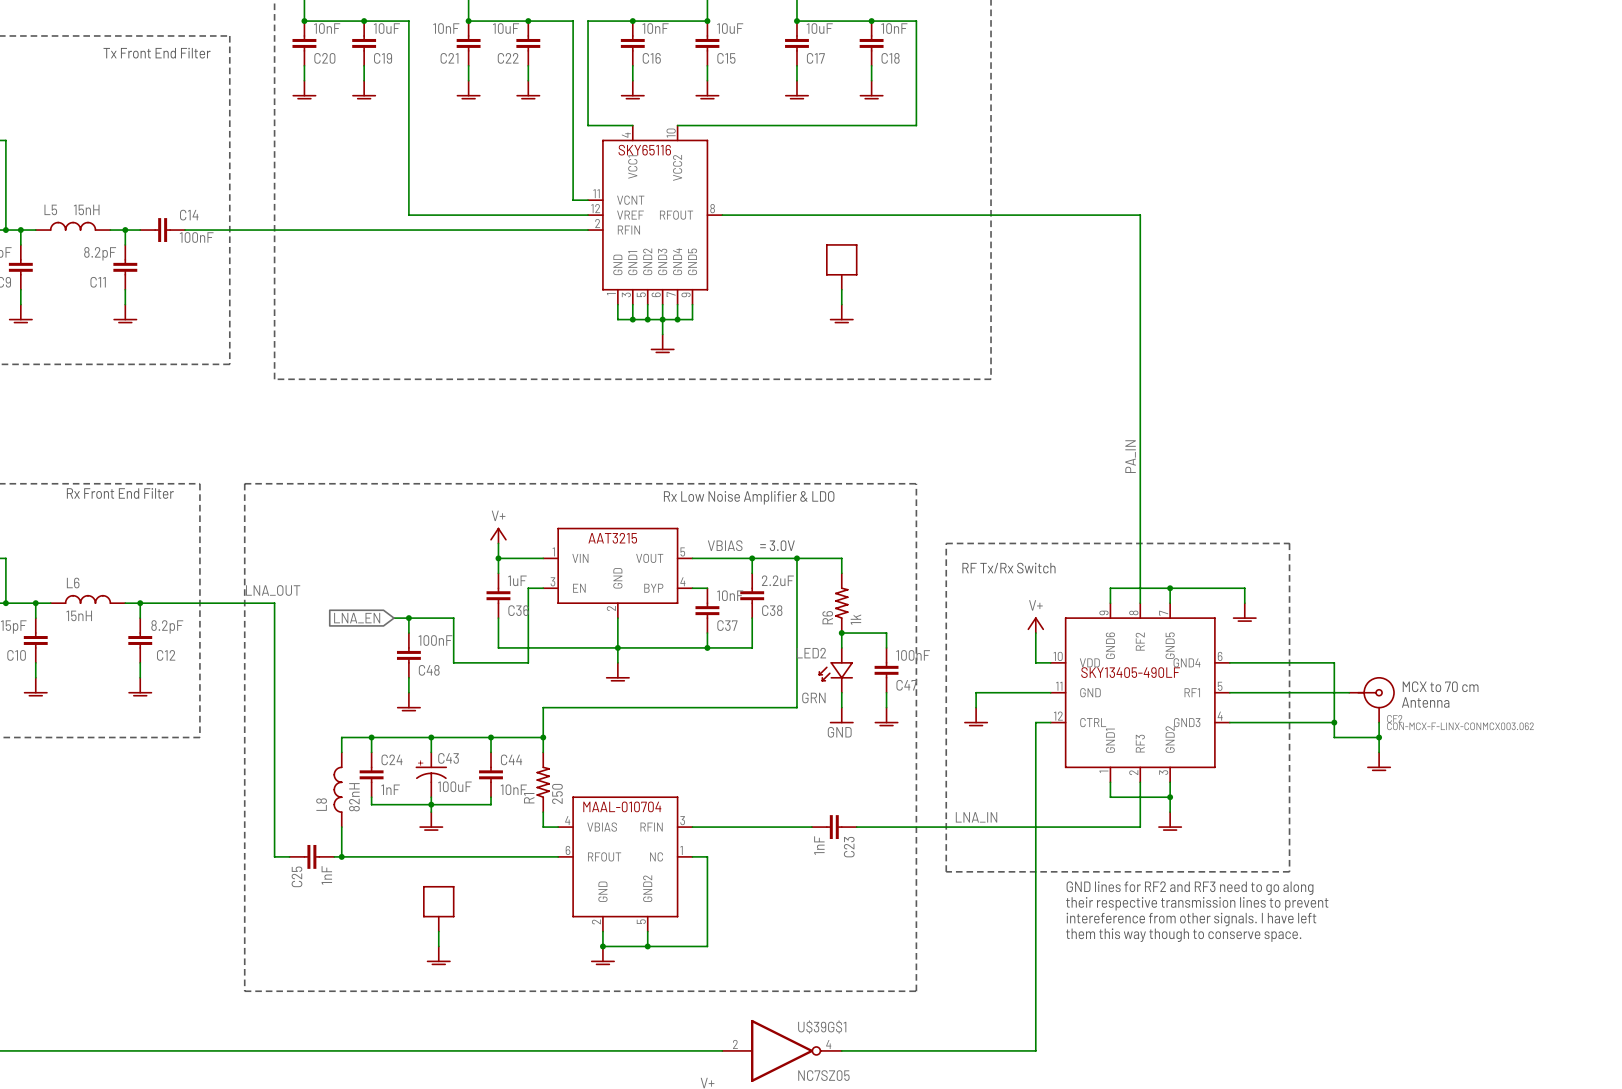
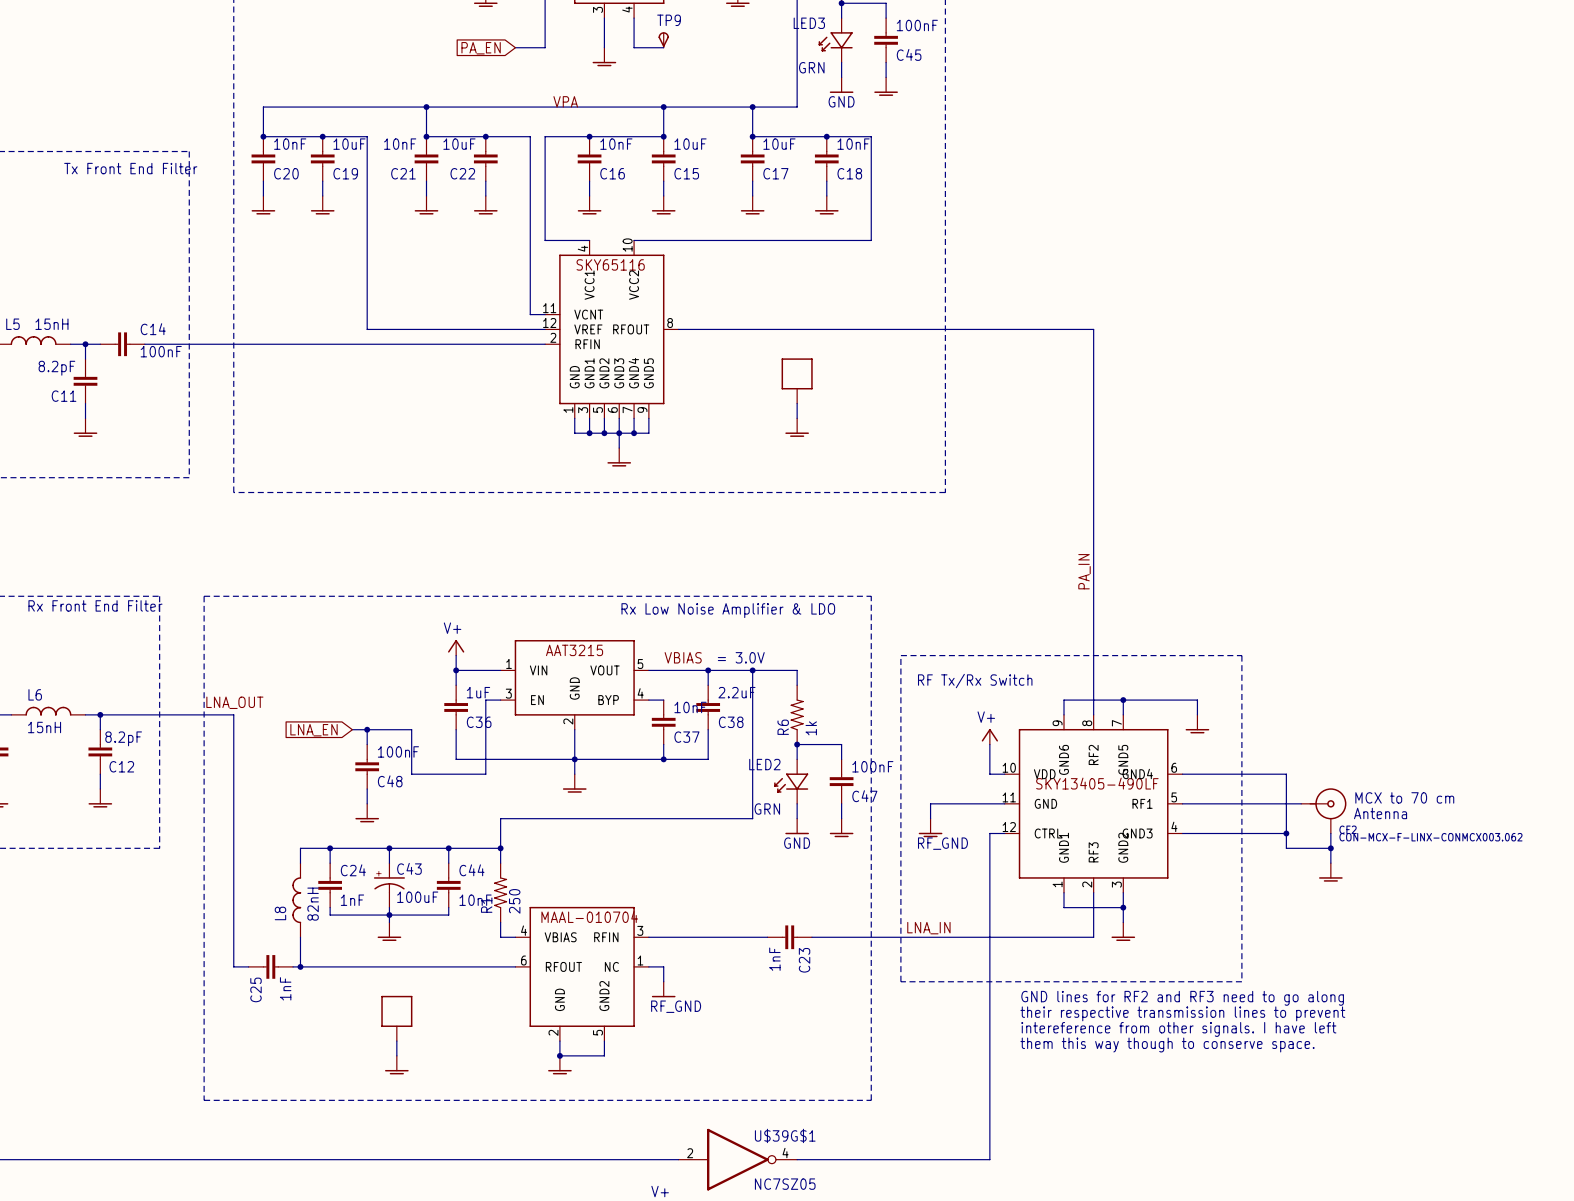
power symbol text: none -> RF_GND (942, 843)
wire: (707, 871) (707, 946) (647, 946) -> none
power symbol: none -> RF_GND (663, 989)
junction: (647, 946) -> none

